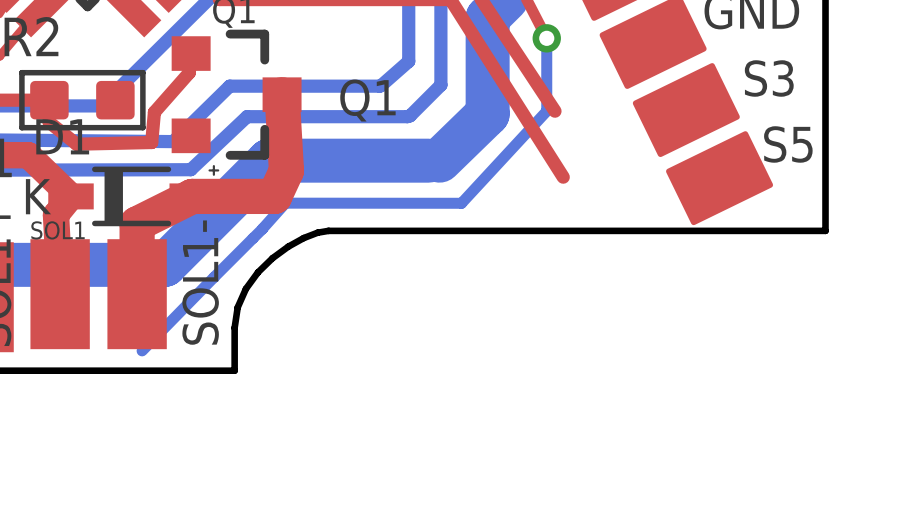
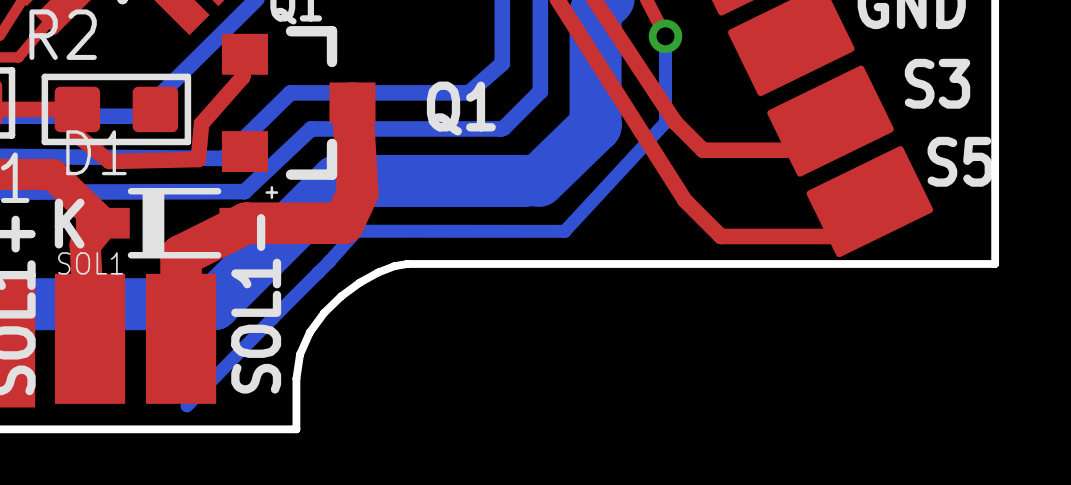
top track: none -> (675, 122) (703, 150) (798, 150) (825, 123)
top track: none -> (685, 200) (721, 236) (832, 236) (864, 204)

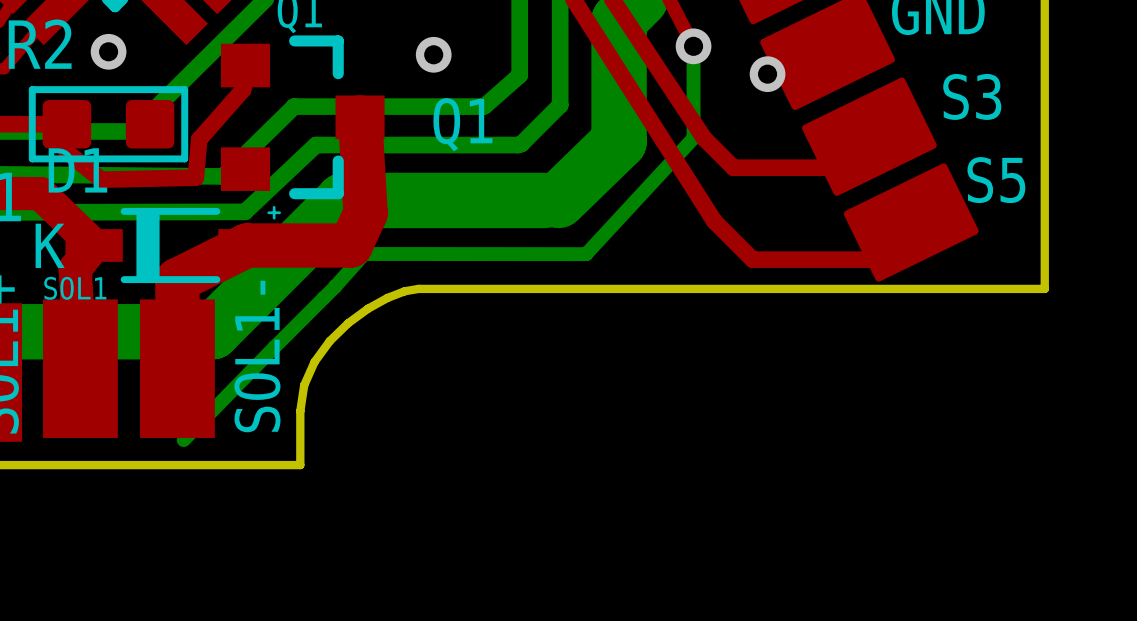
via: none -> (108, 51)
via: none -> (433, 54)
via: none -> (767, 74)

